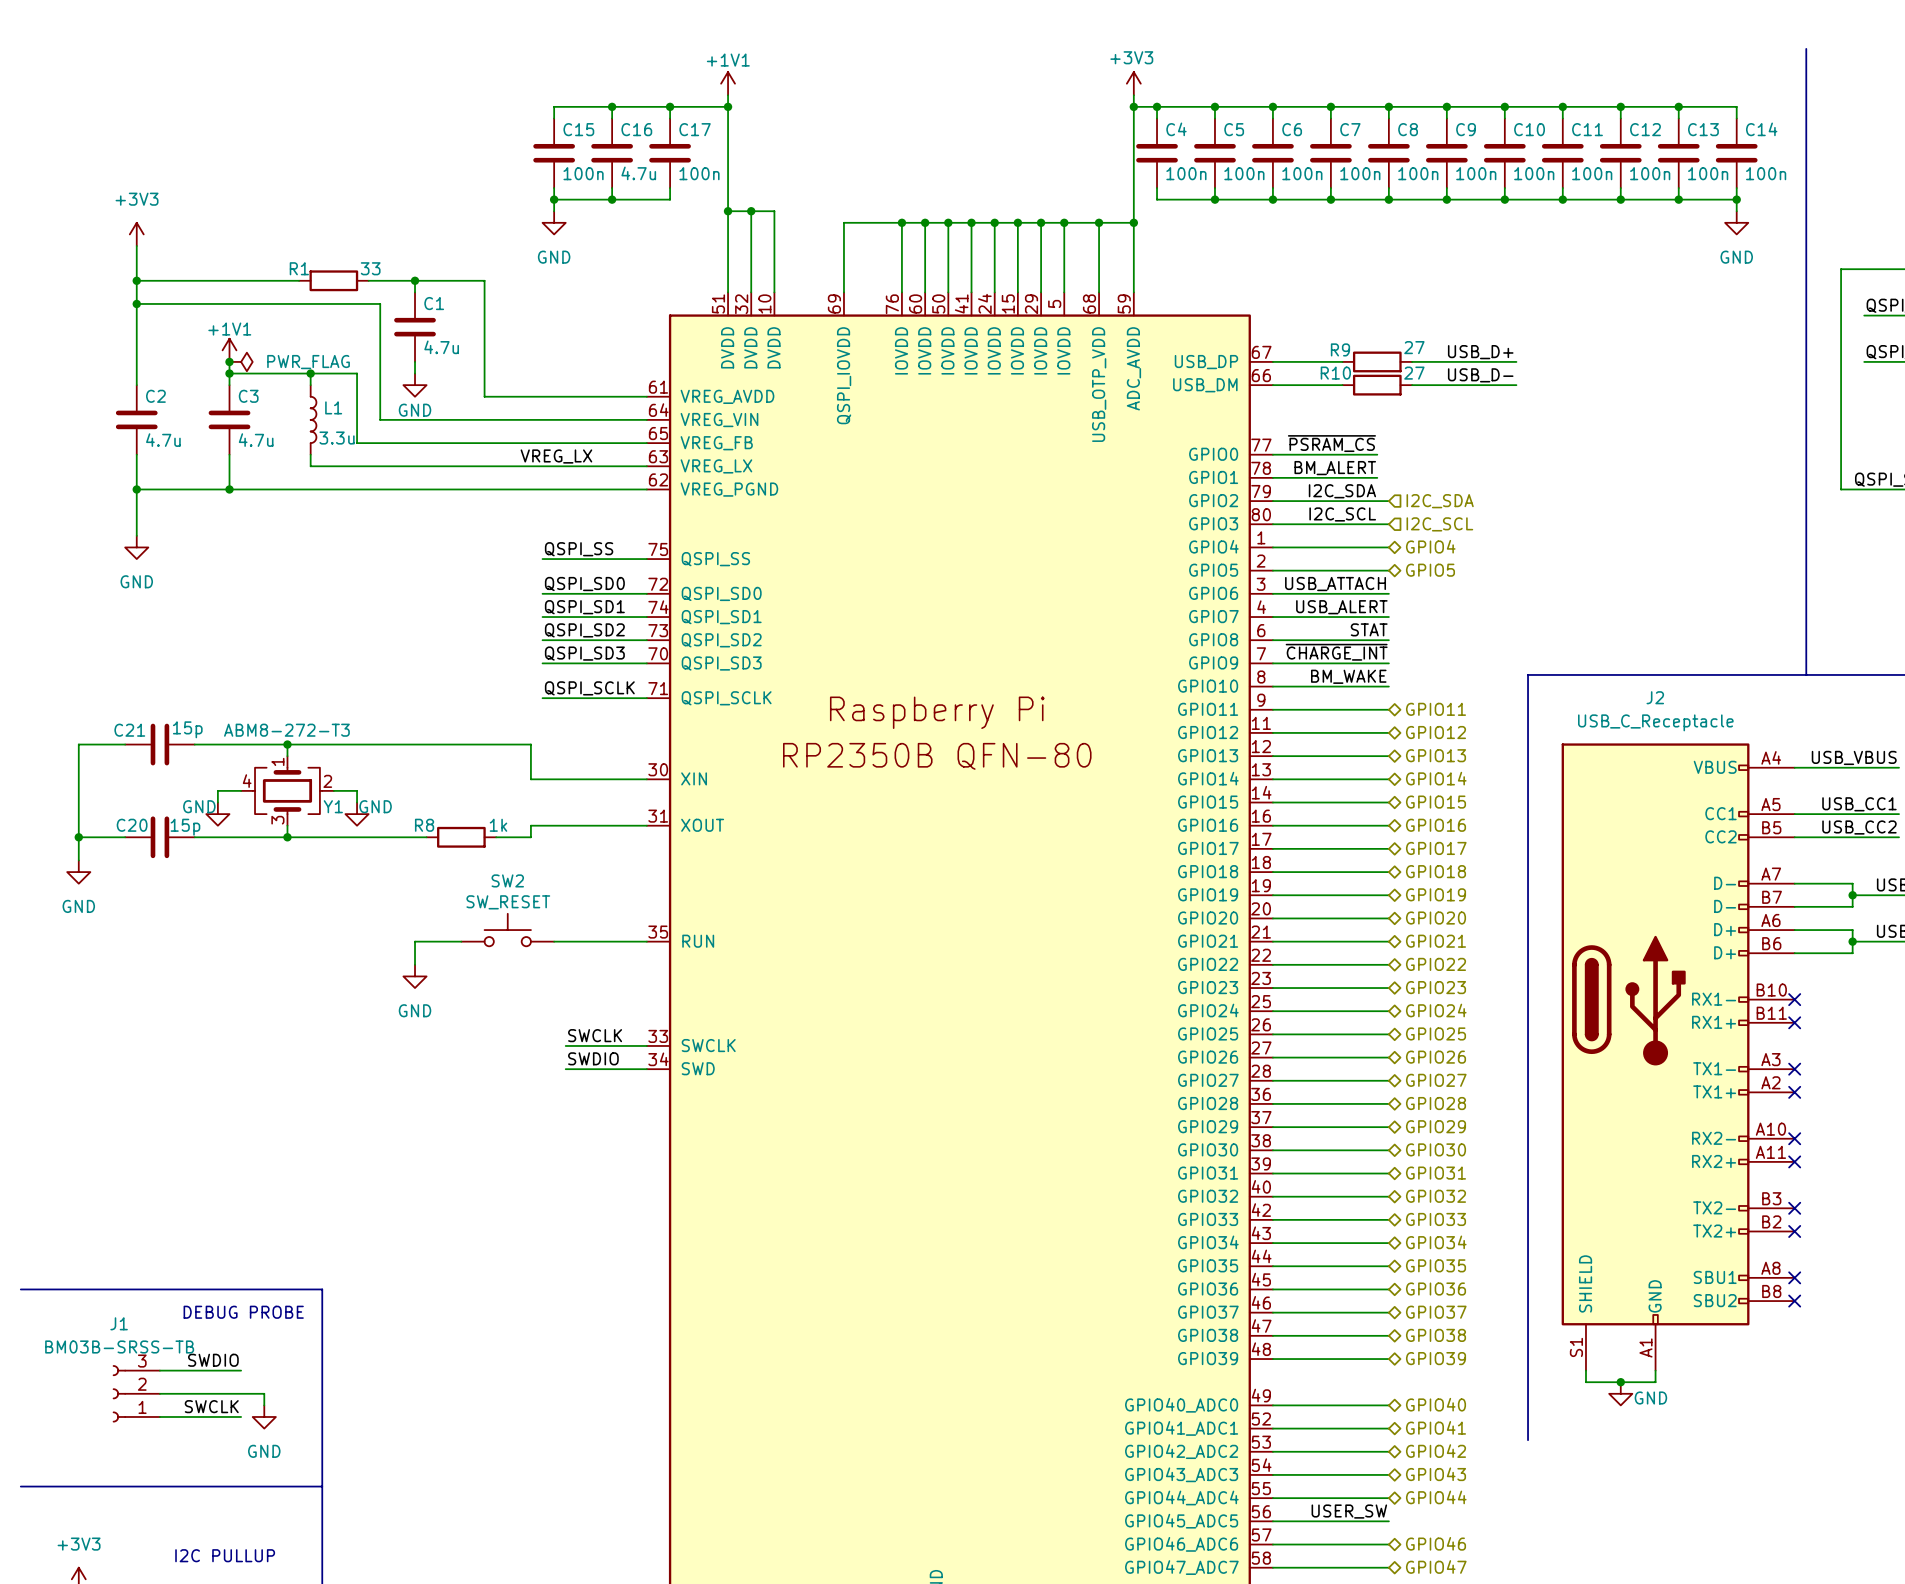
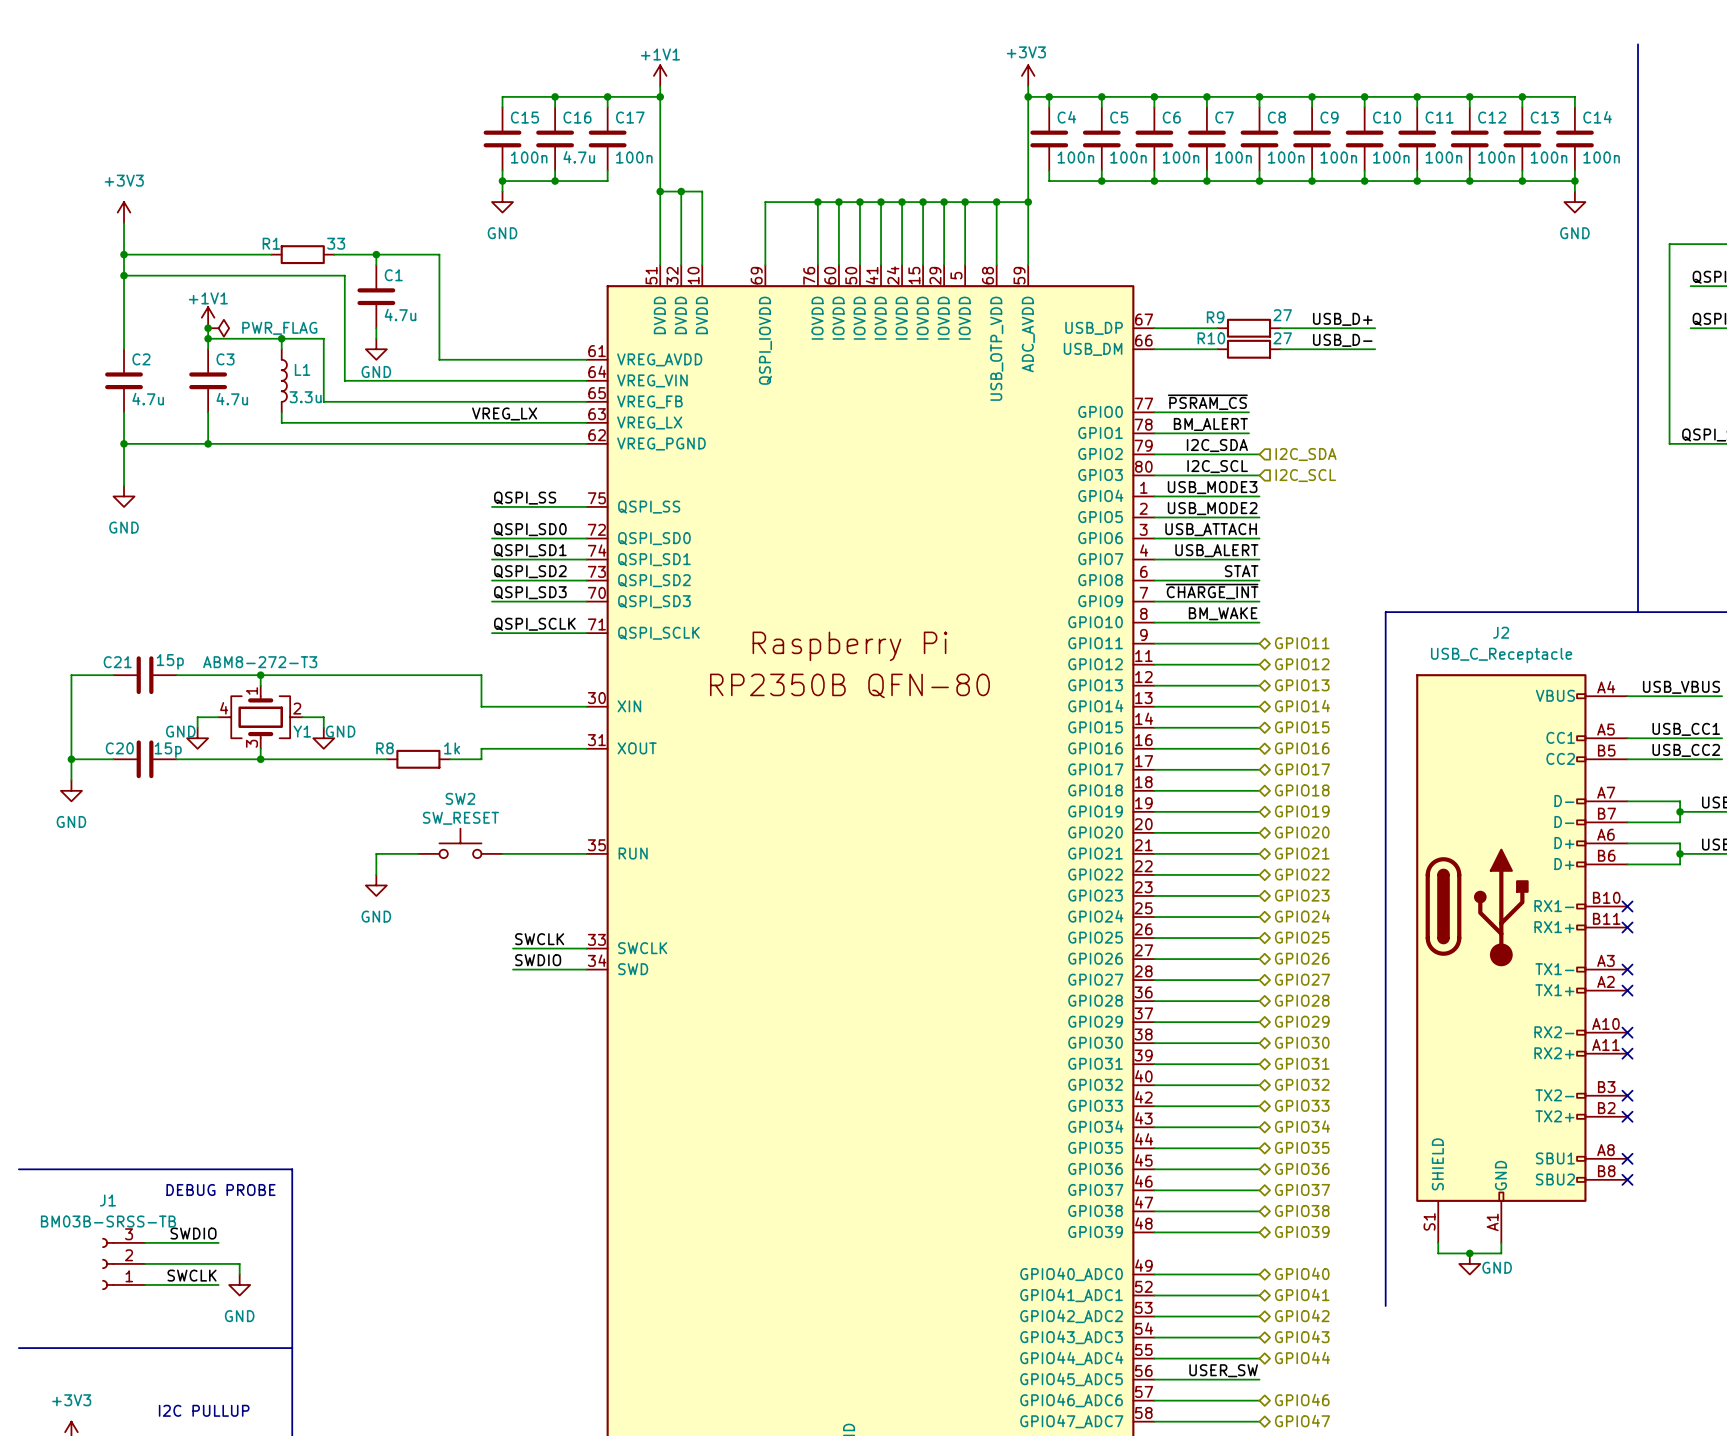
label: none -> USB_MODE3 (1212, 487)
hierarchical label: GPIO4 (1430, 546) -> none
label: none -> USB_MODE2 (1212, 508)
hierarchical label: GPIO5 (1430, 570) -> none

